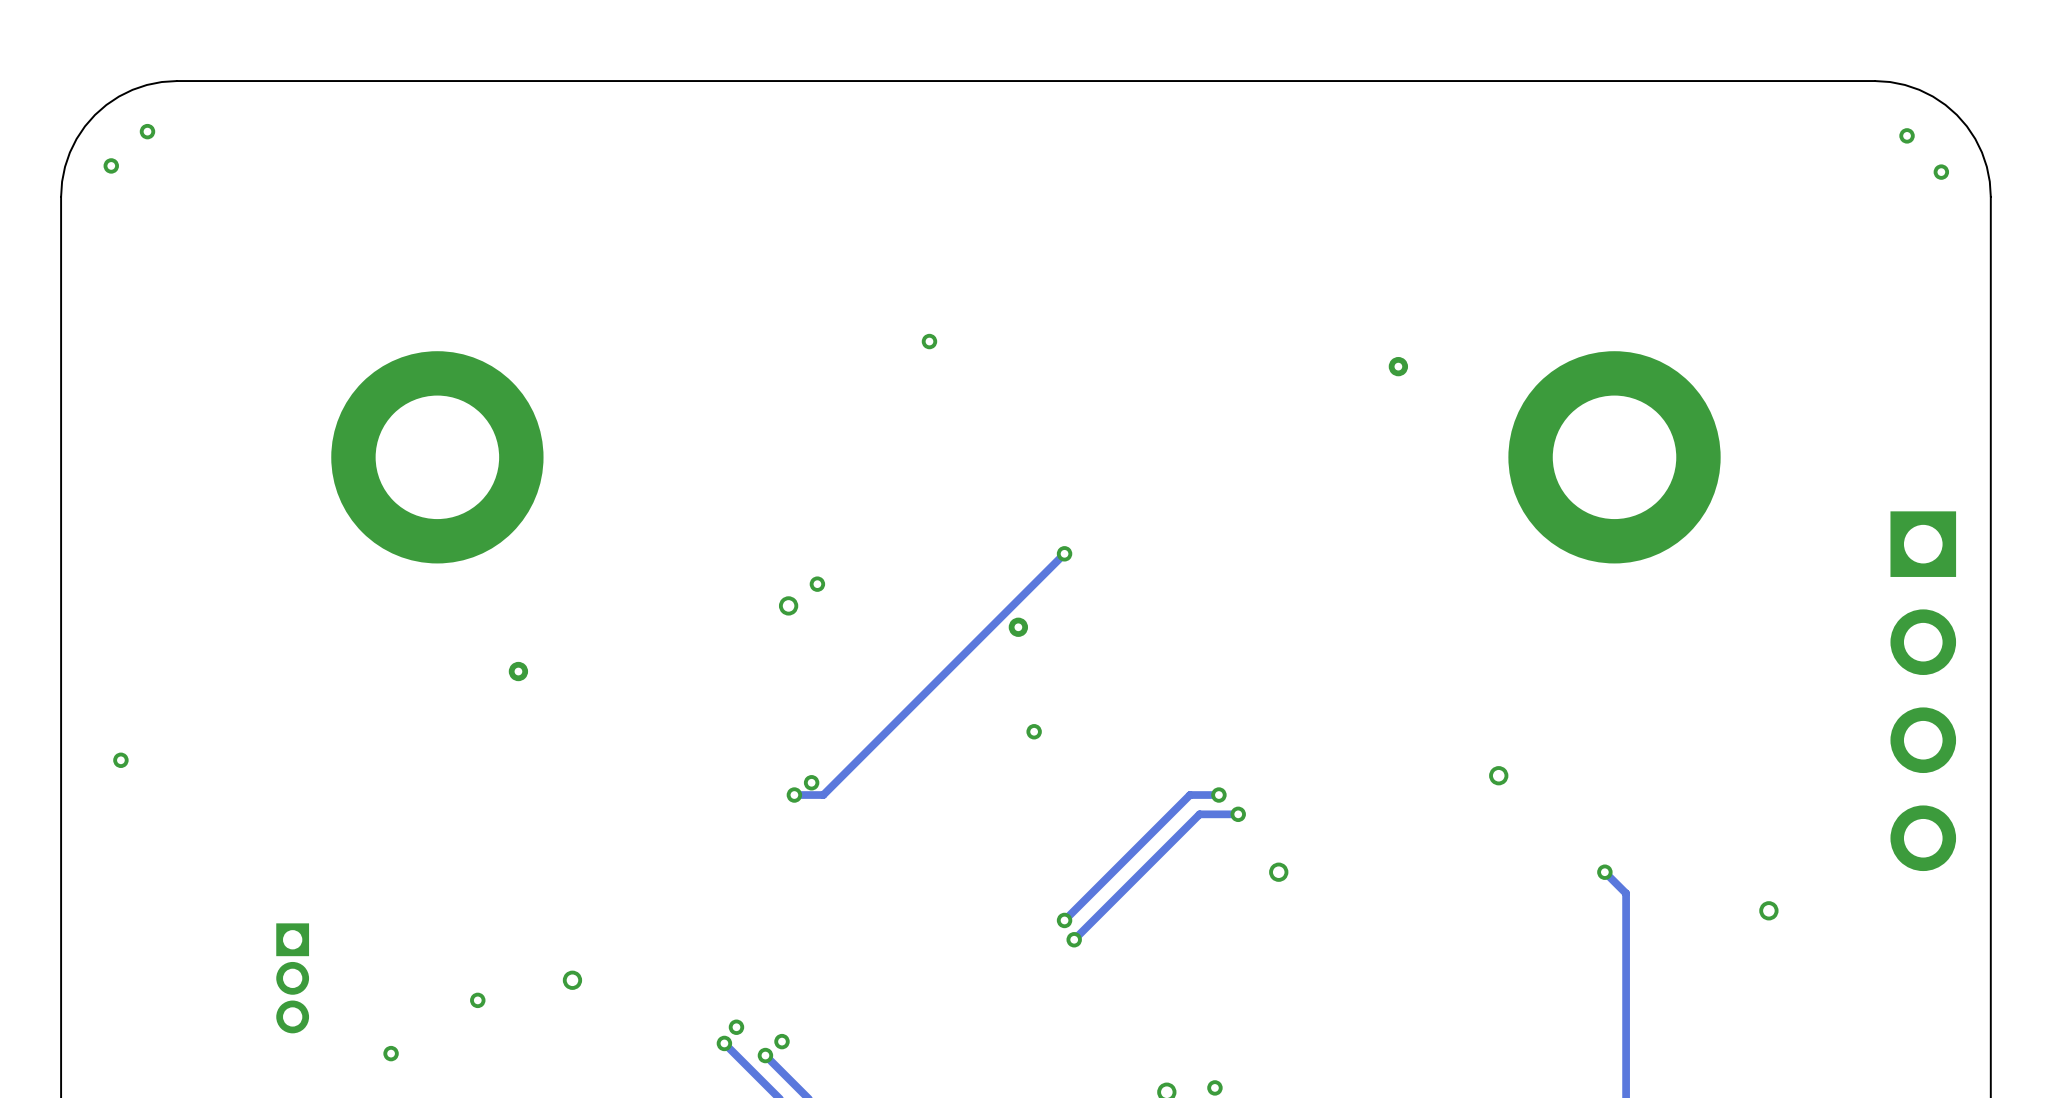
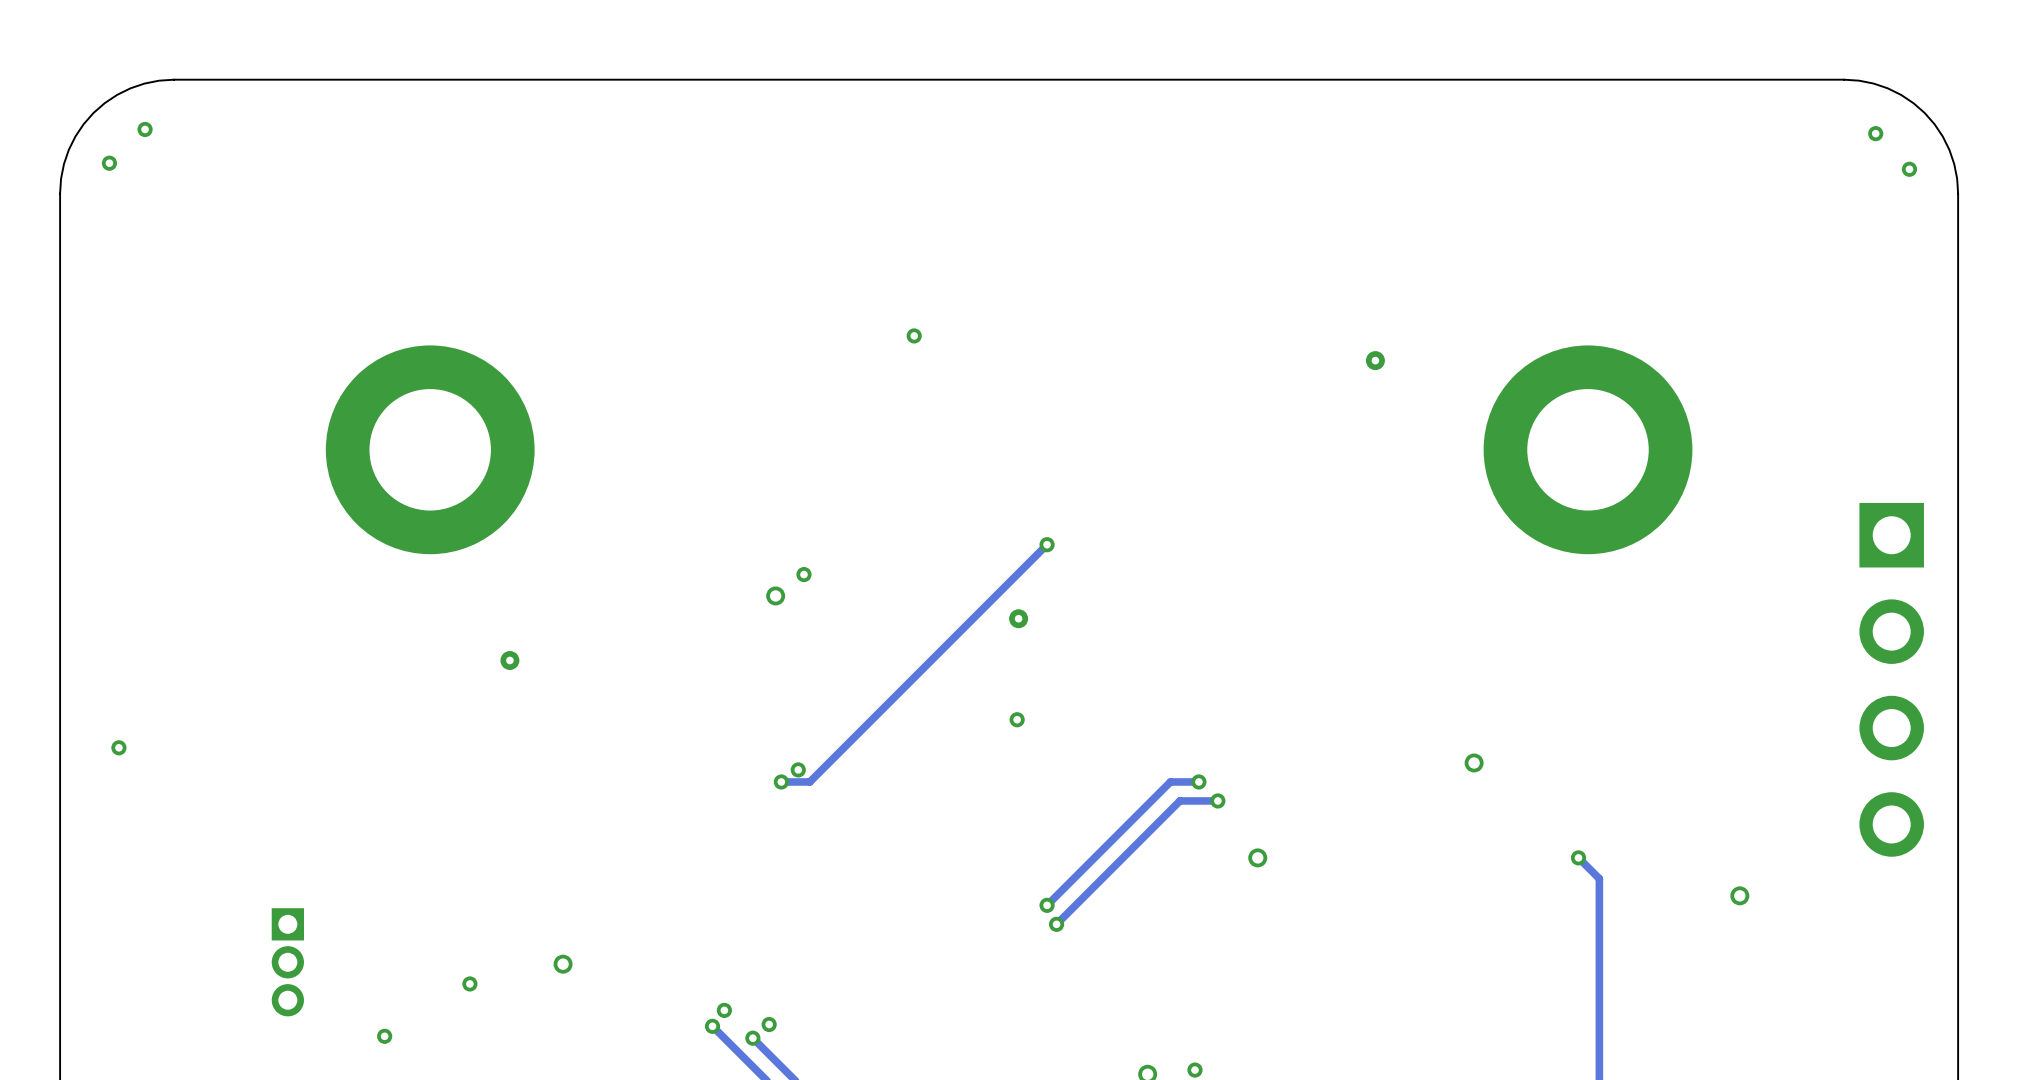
via position: (1018, 627) -> (1018, 618)

